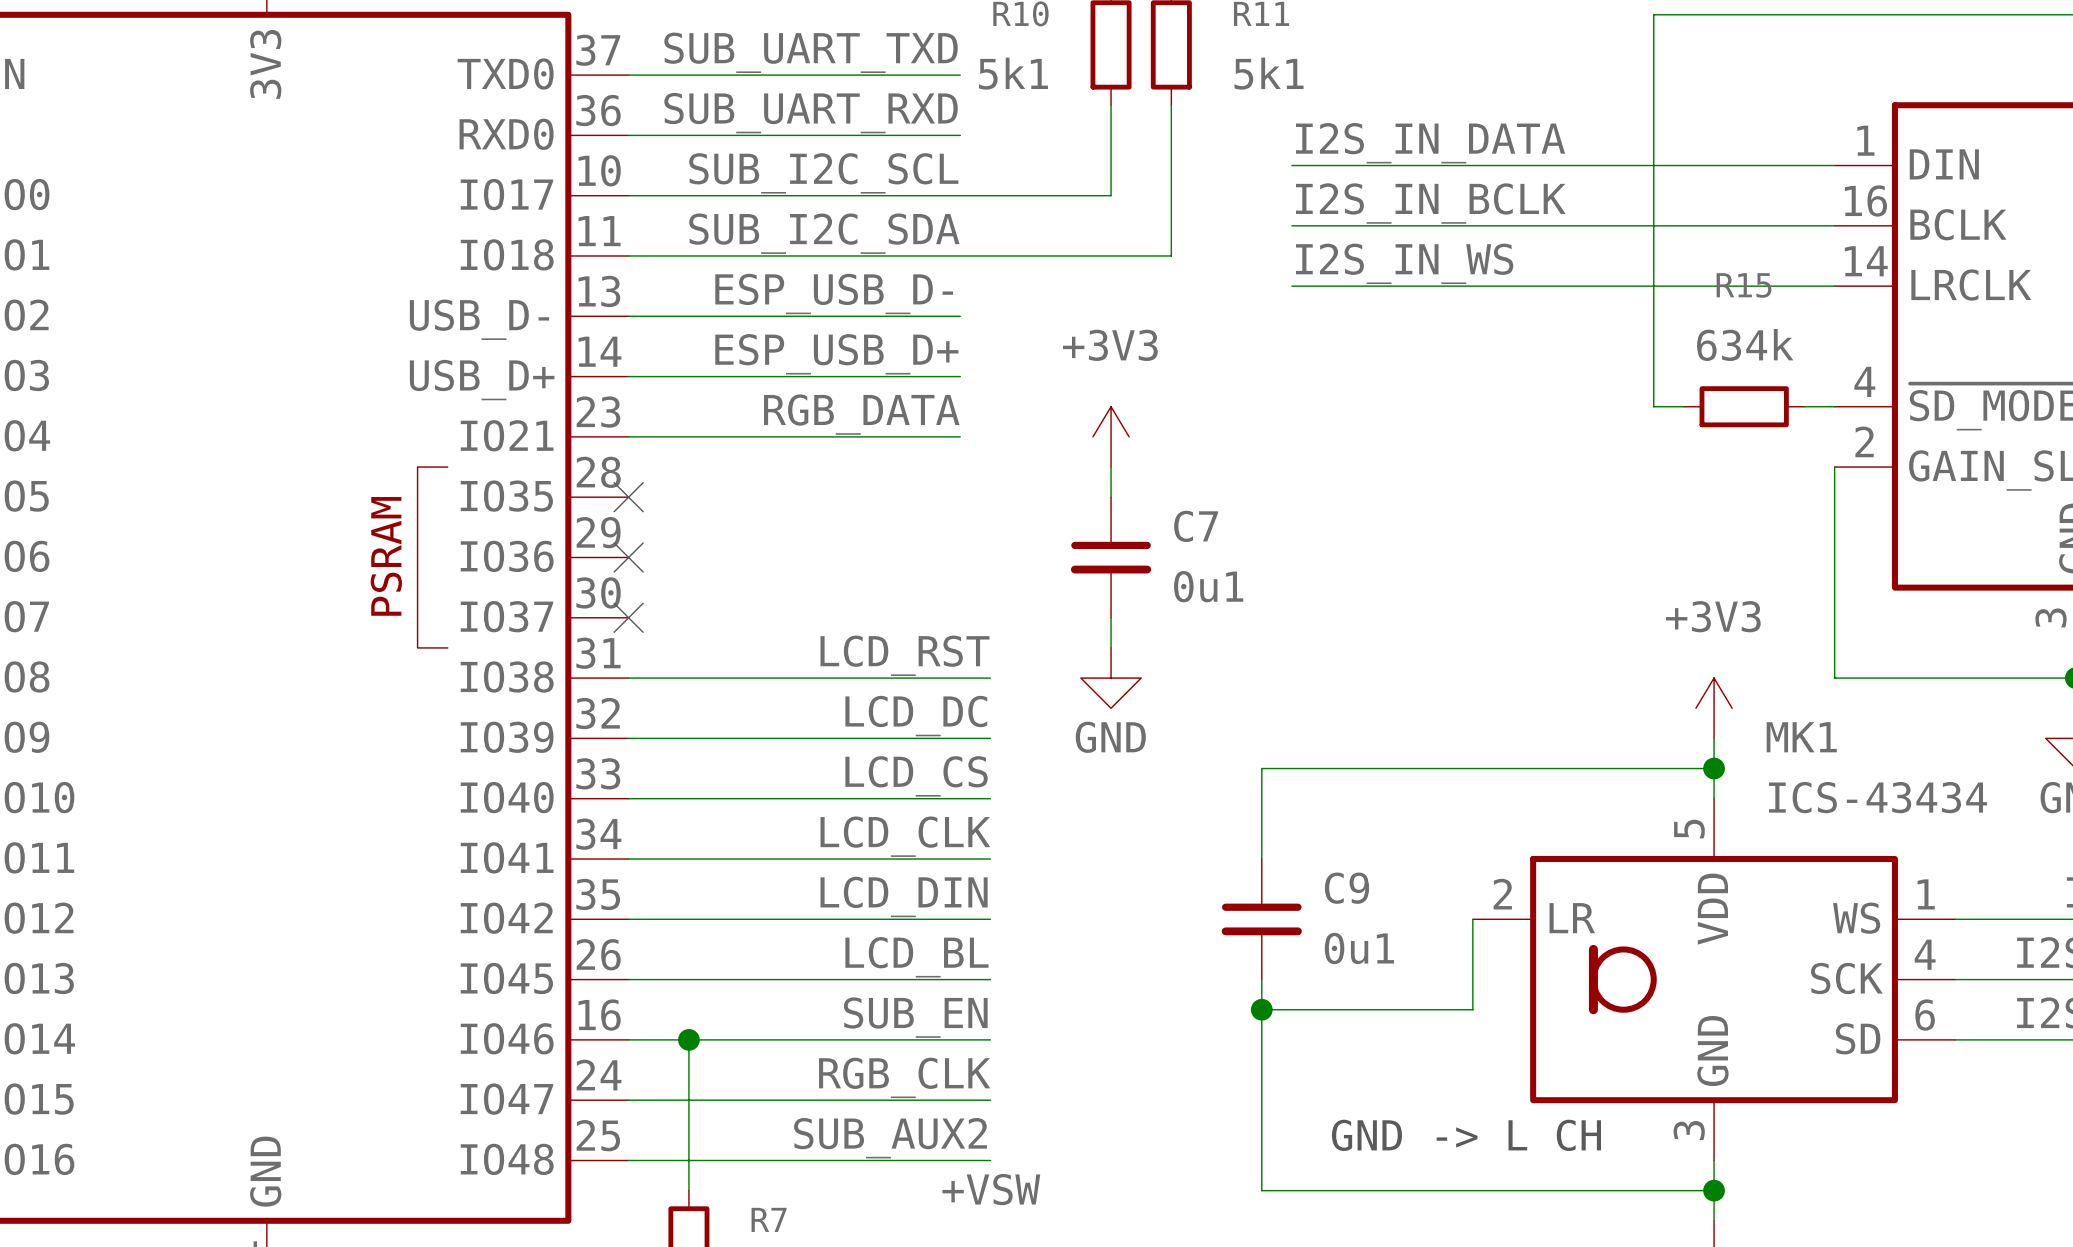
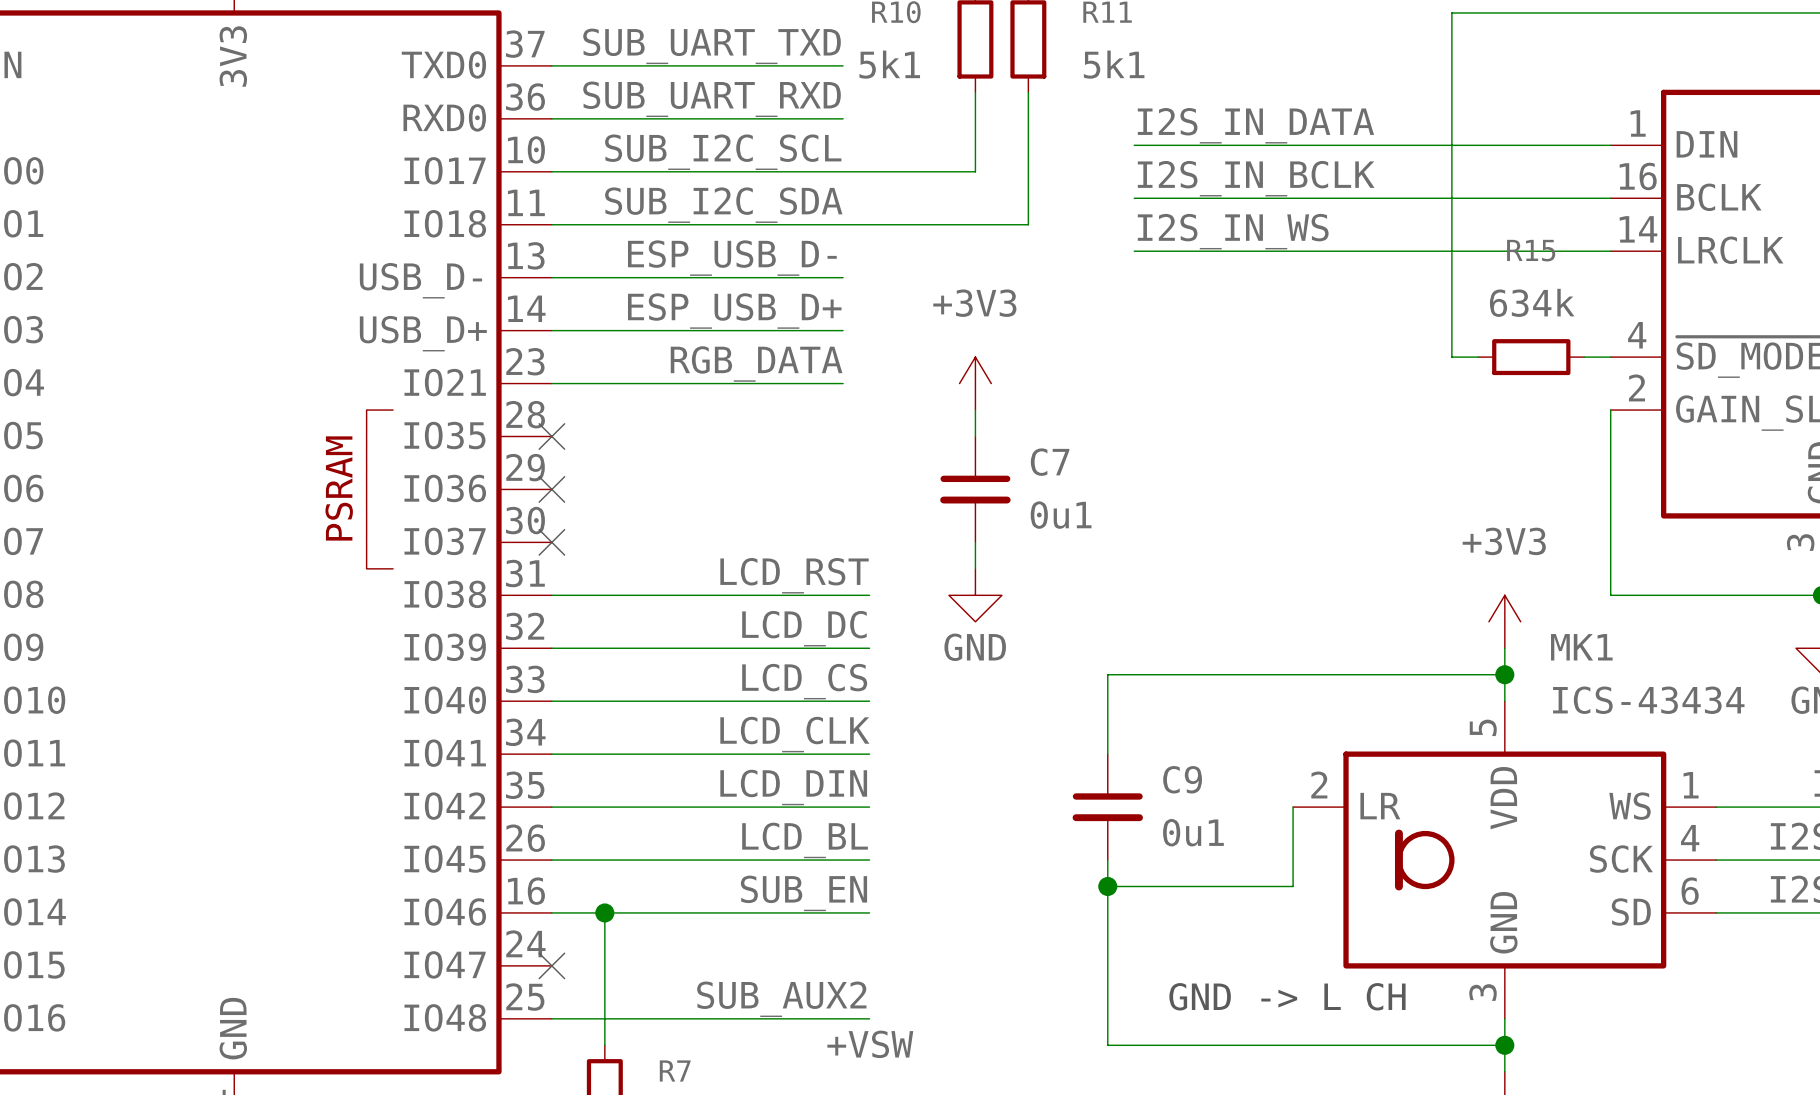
label: RGB_CLK (904, 1077) -> none
wire: (628, 1100) (990, 1100) -> none
no-connect mark: none -> (551, 965)

